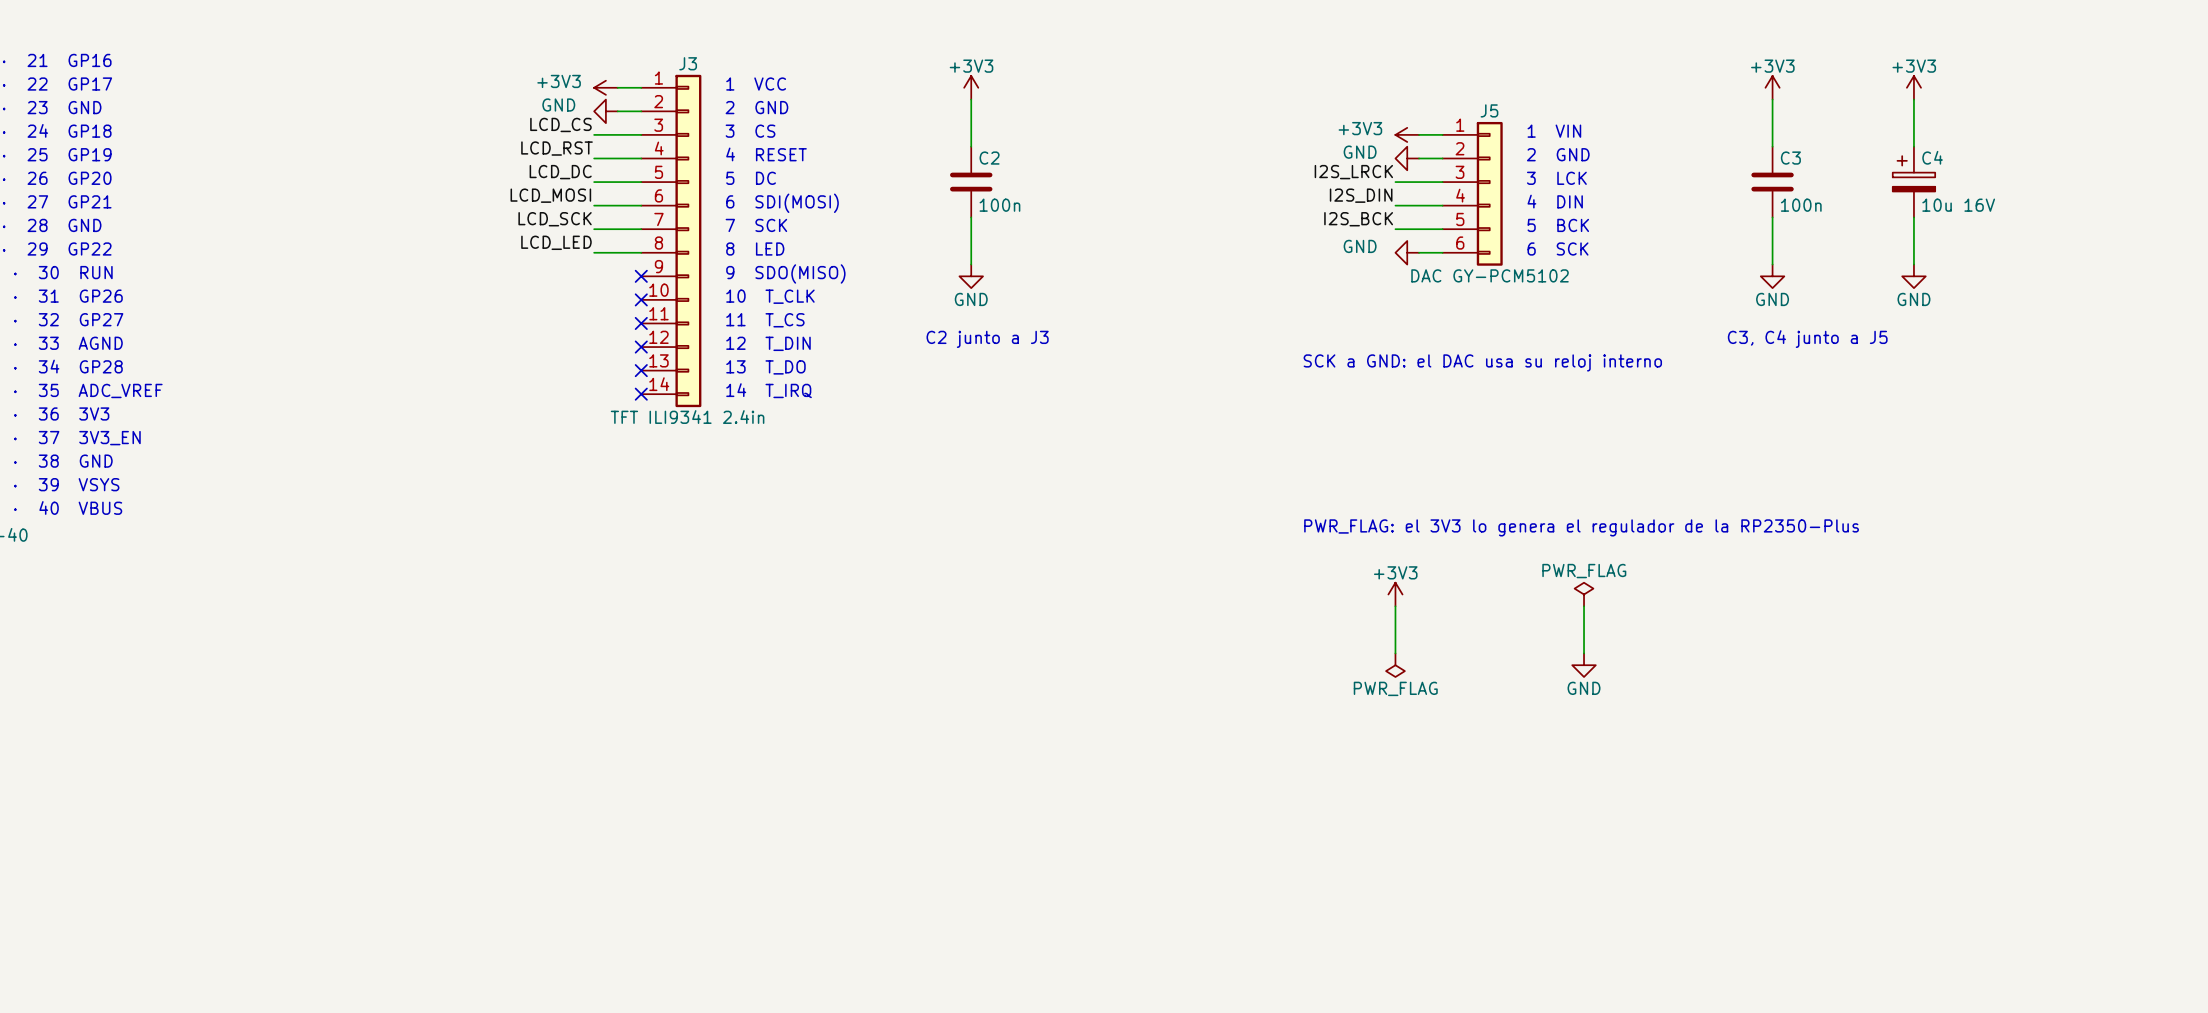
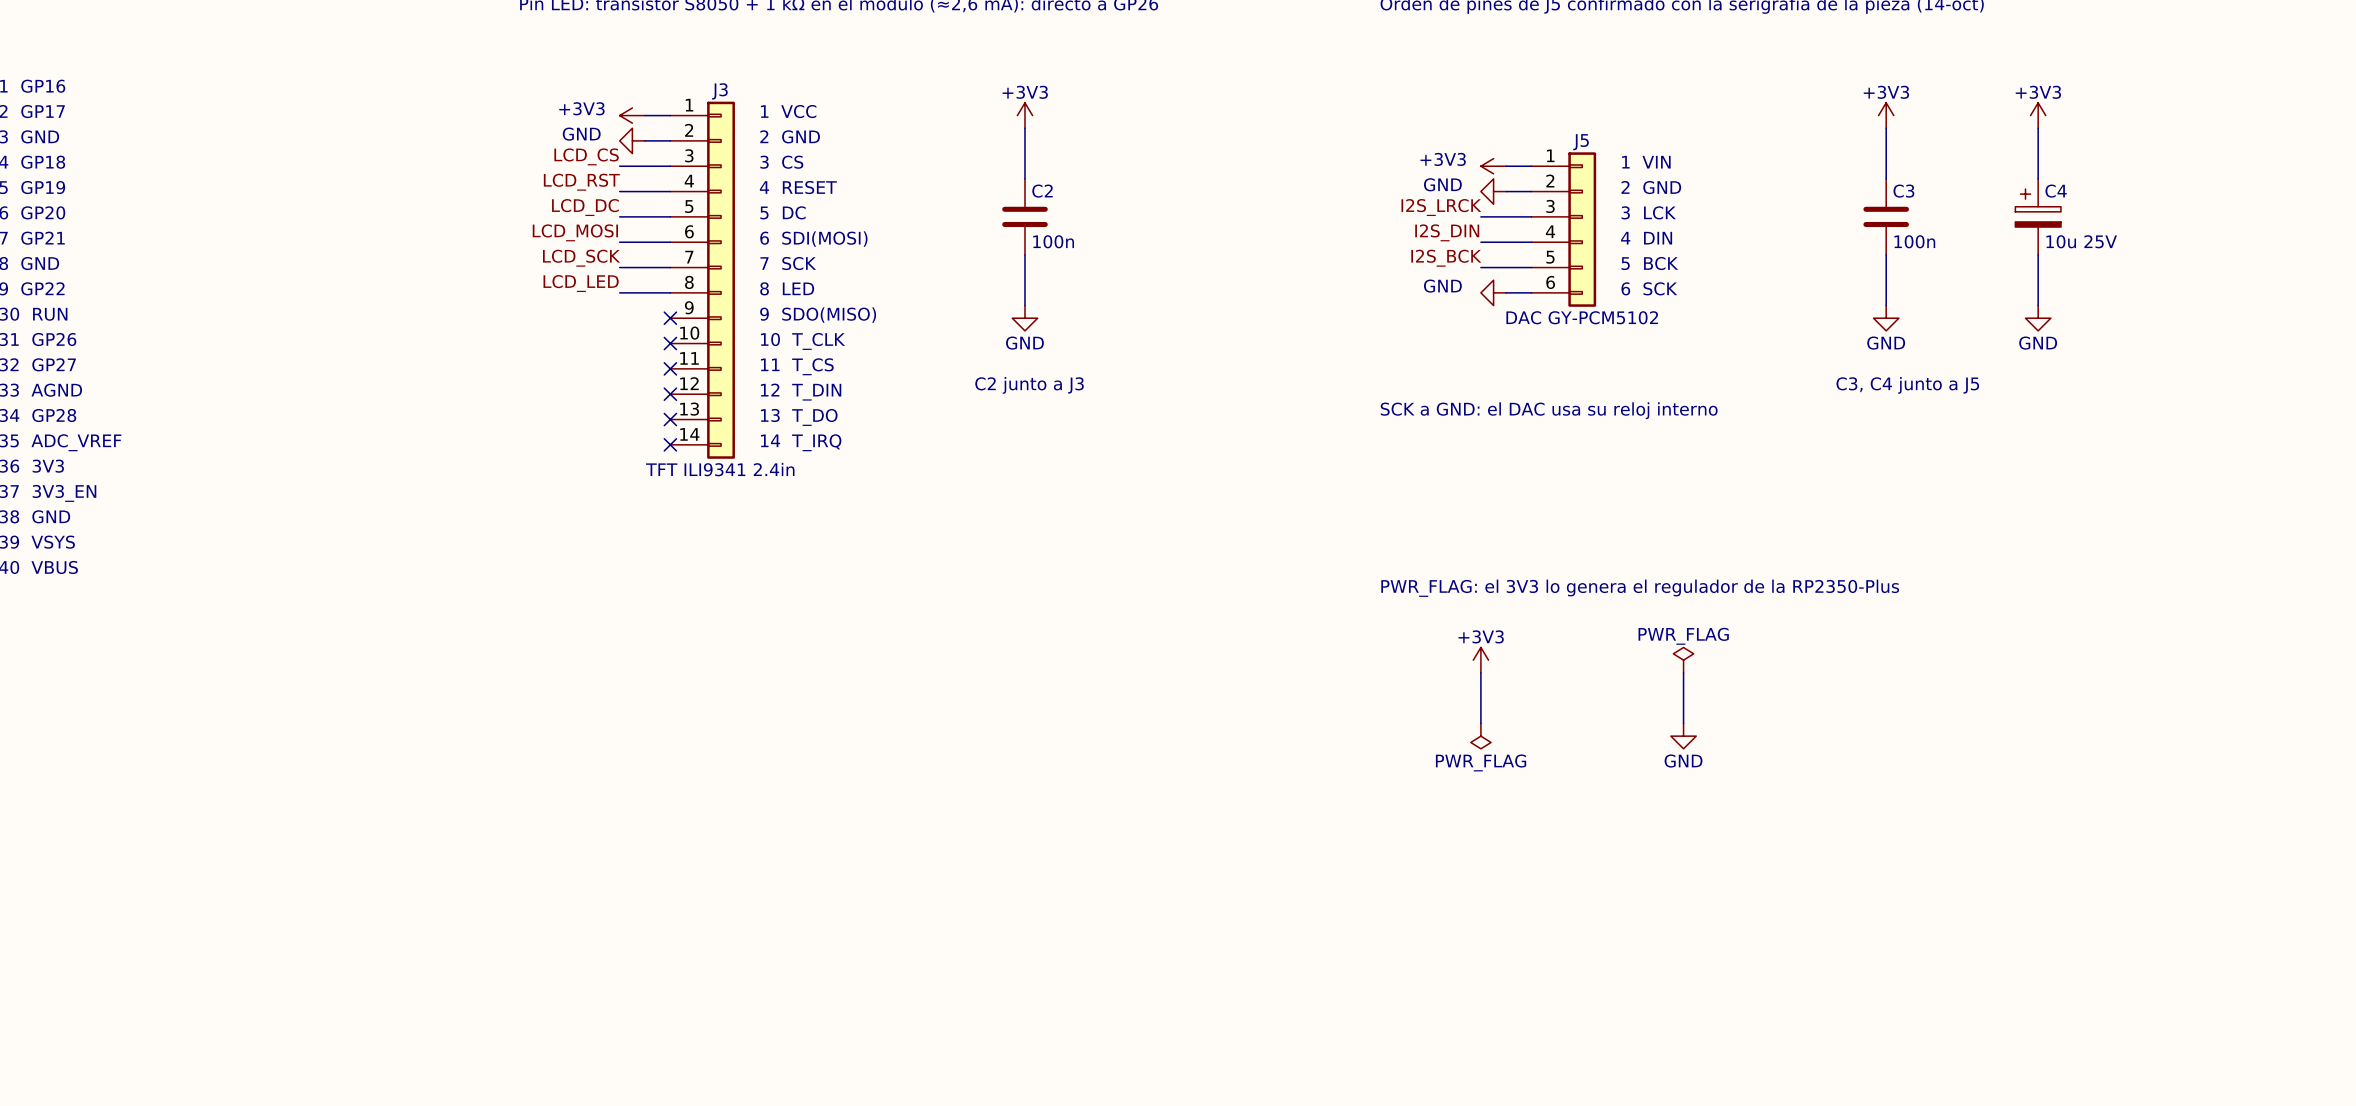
C4 value: 10u 16V (1958, 205) -> 10u 25V (2081, 241)

